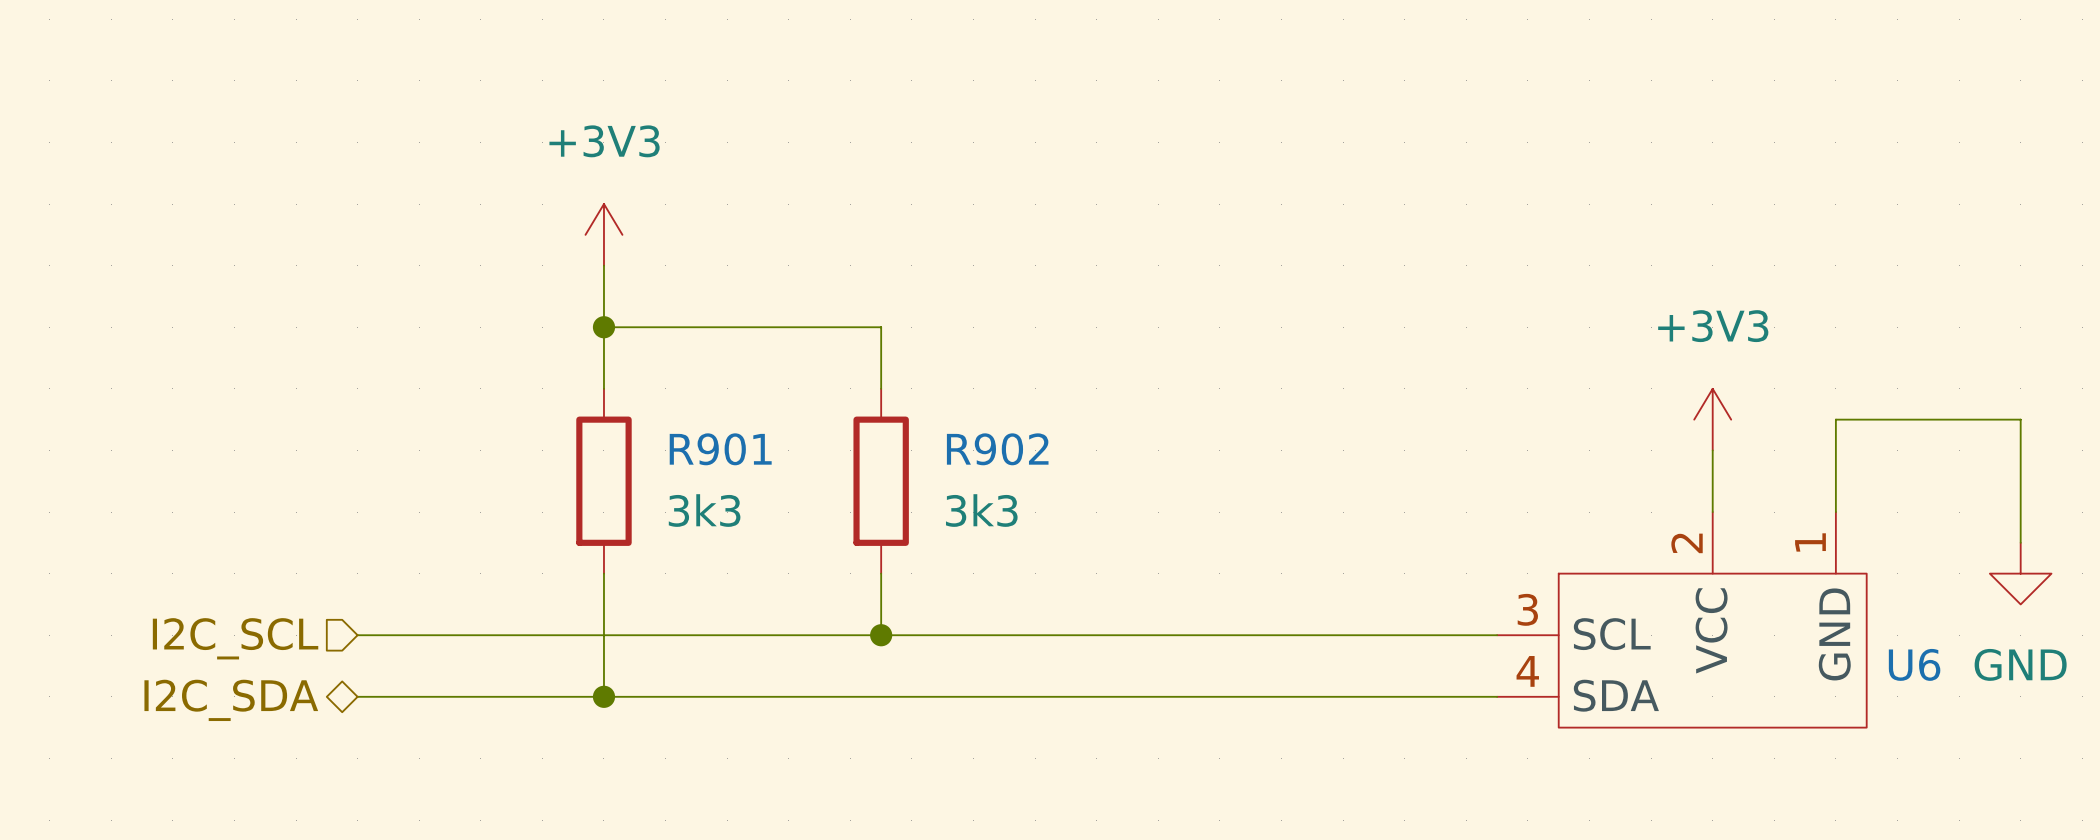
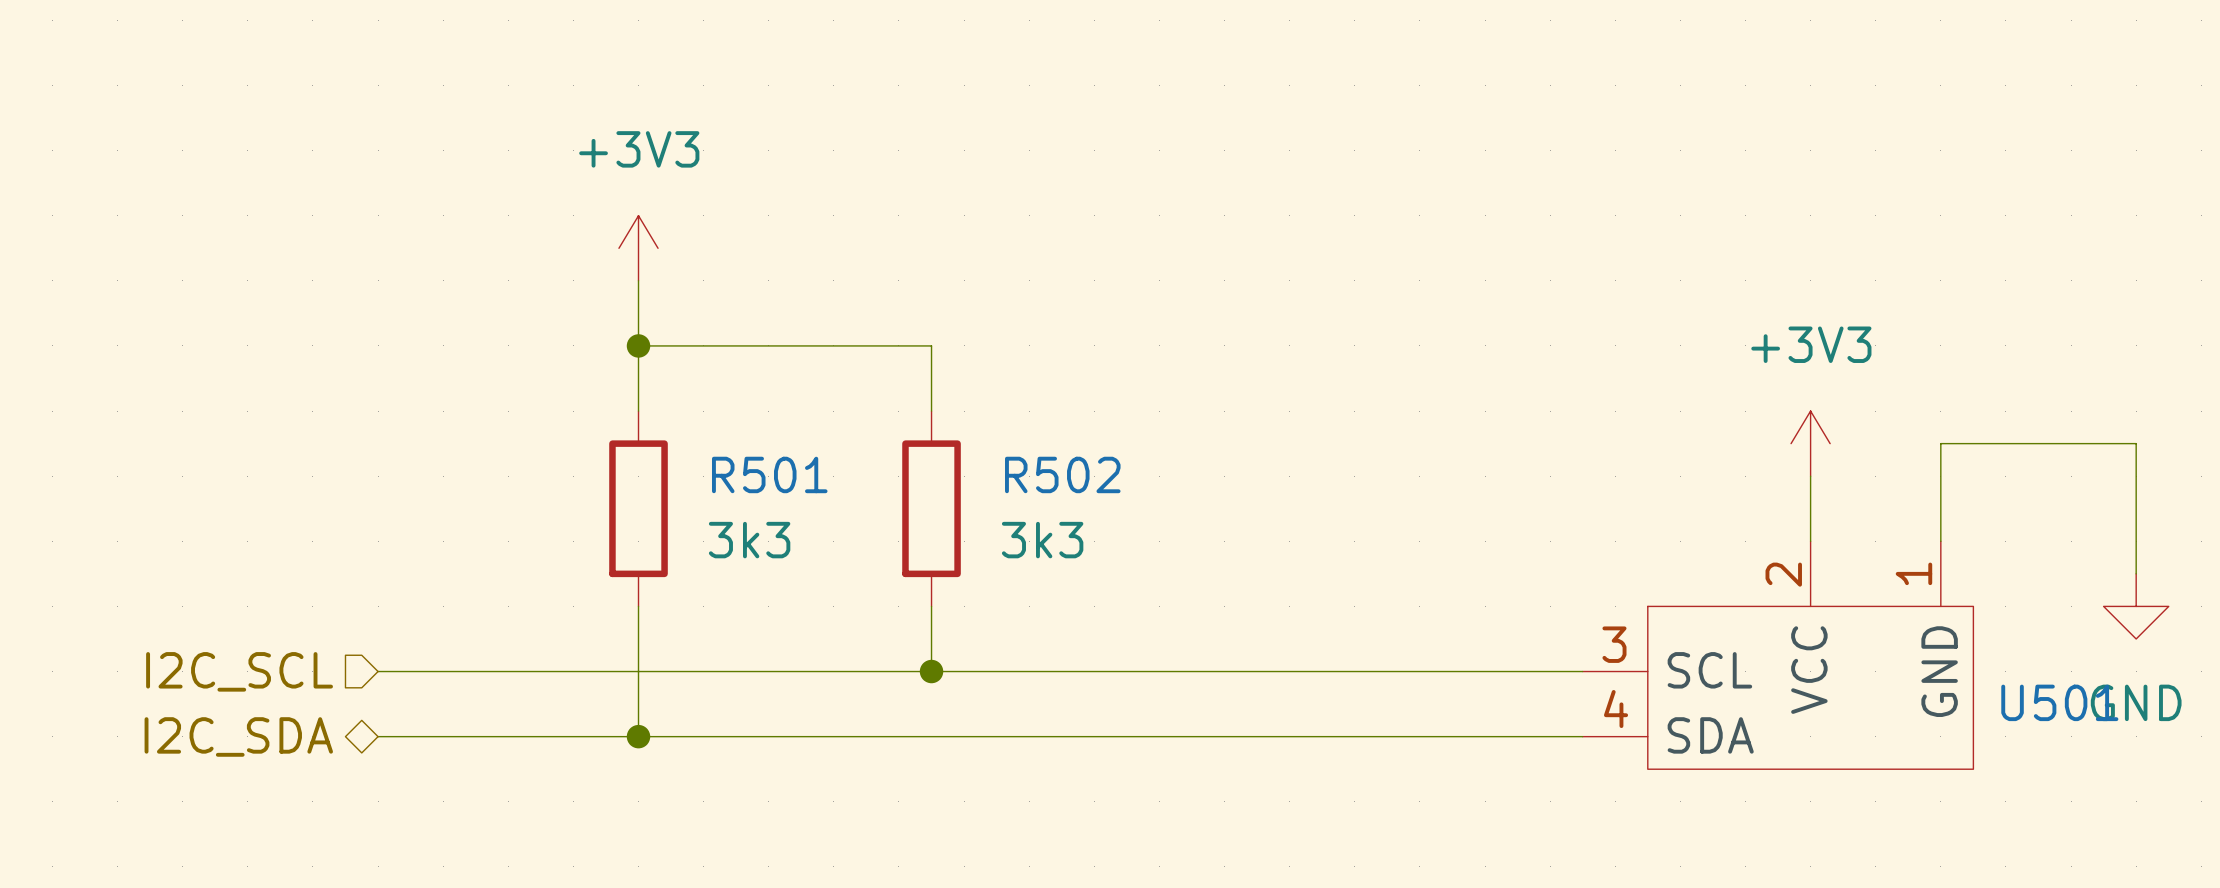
R901 name: R901 (720, 449) -> R501 (769, 474)
R902 name: R902 (997, 449) -> R502 (1062, 474)
U6 name: U6 (1914, 664) -> U501 (2059, 702)

